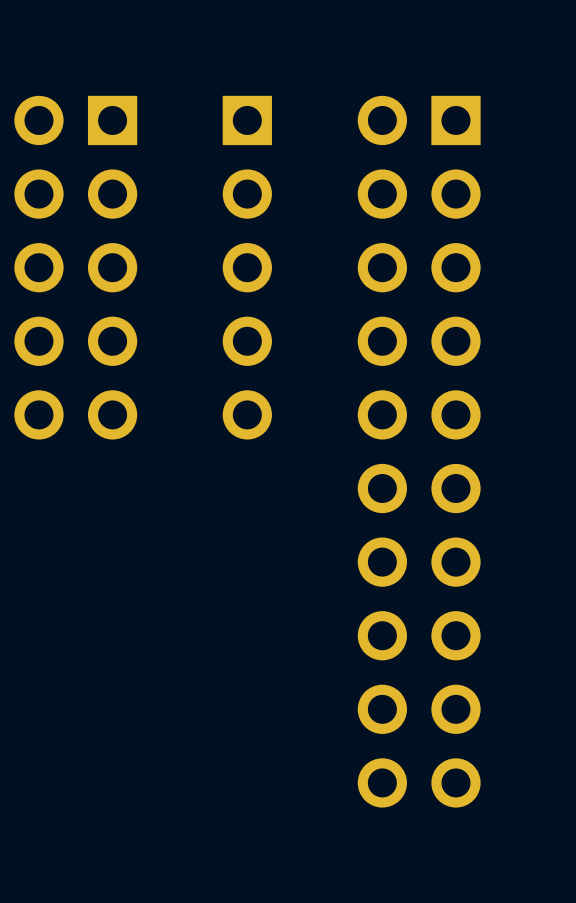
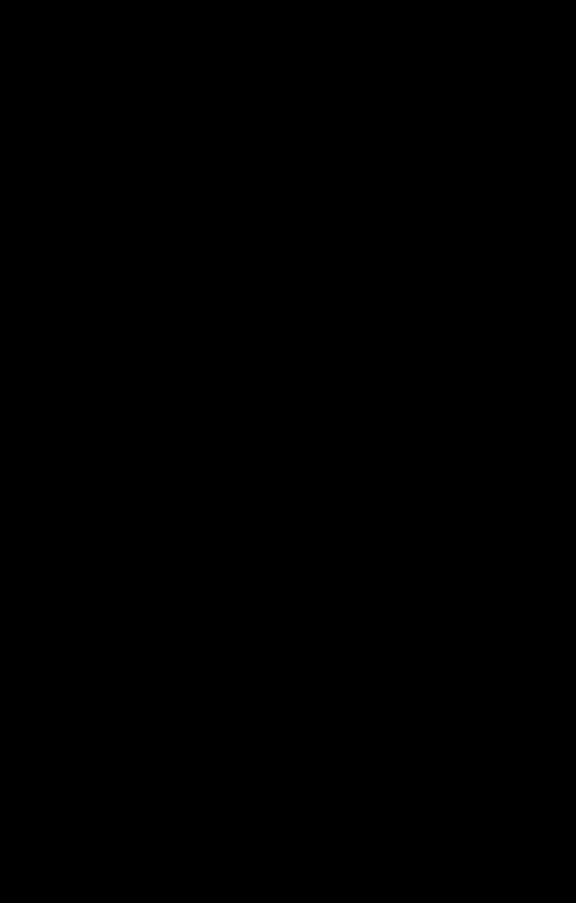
part: (75, 267) -> none
part: (247, 267) -> none
part: (419, 451) -> none

